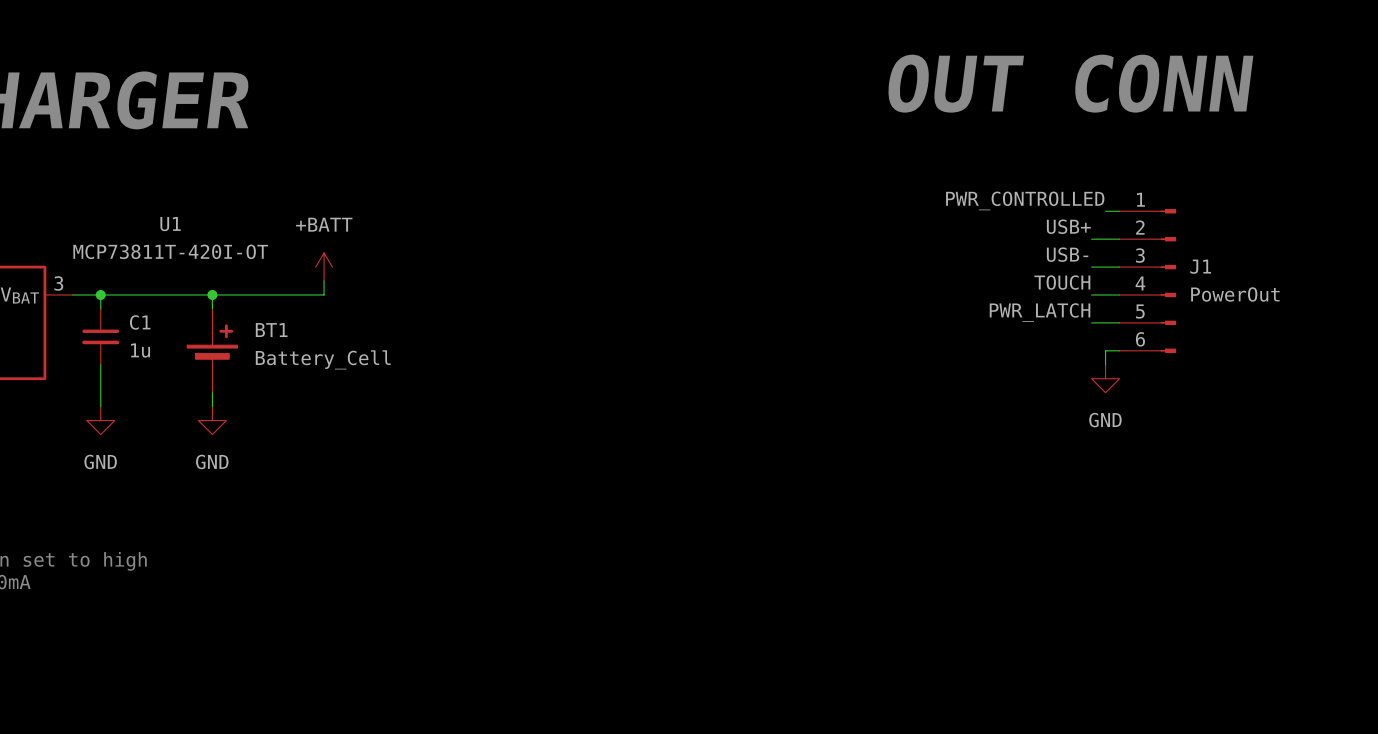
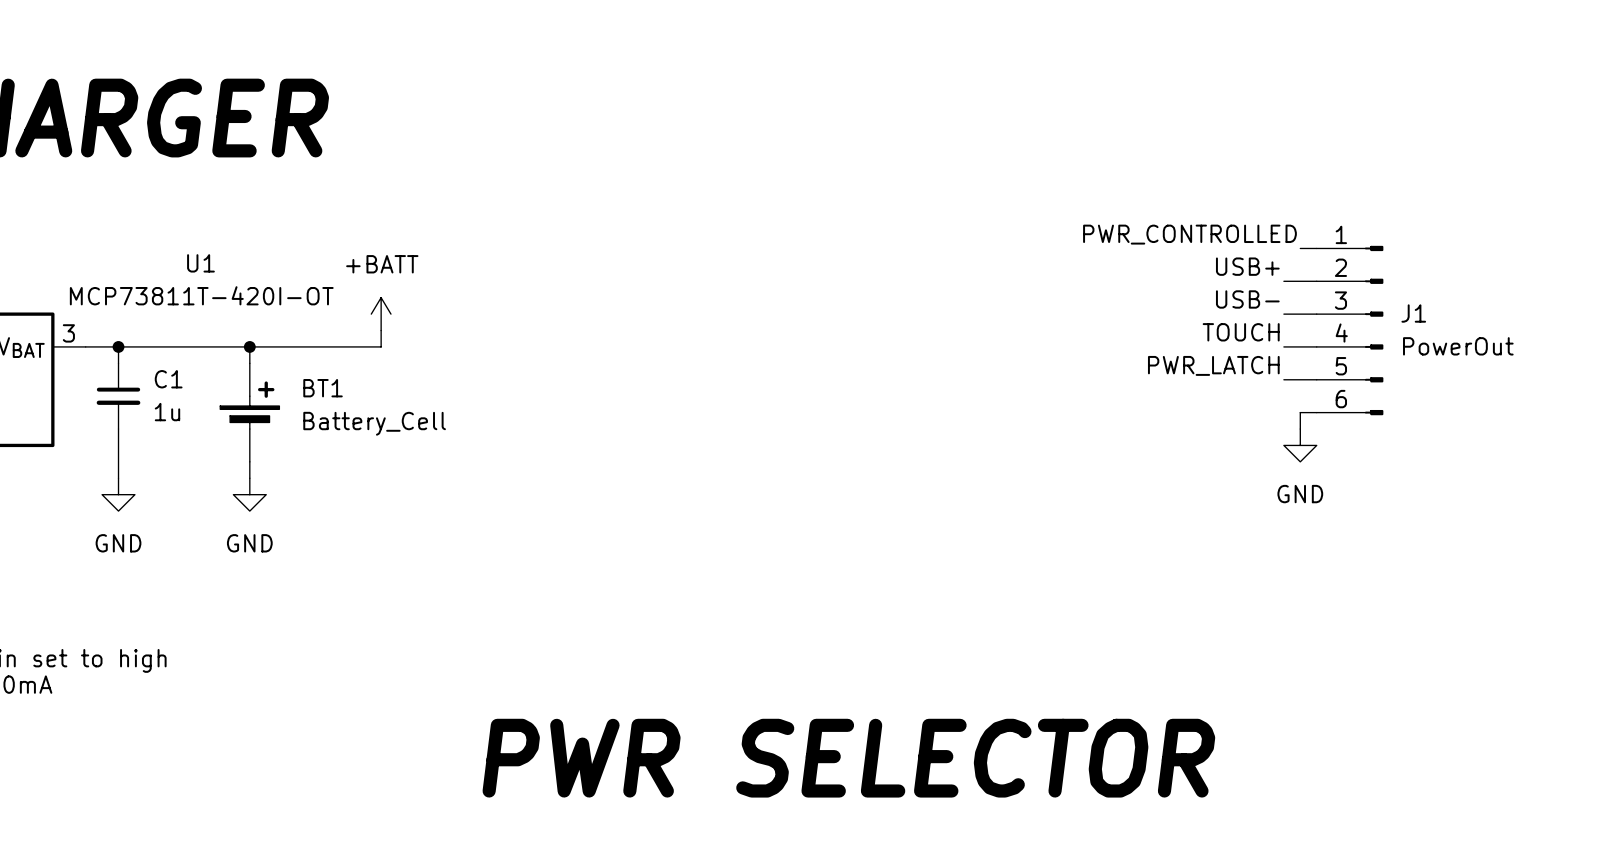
text: OUT CONN (1070, 83) -> none
text: none -> PWR SELECTOR (848, 758)

